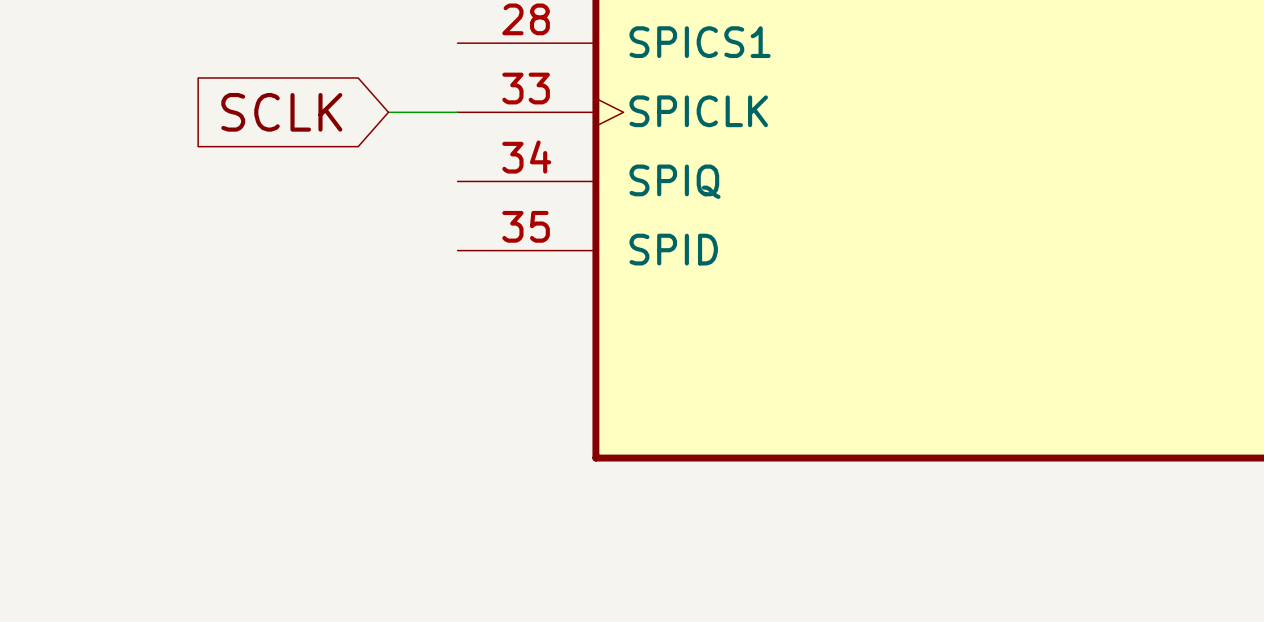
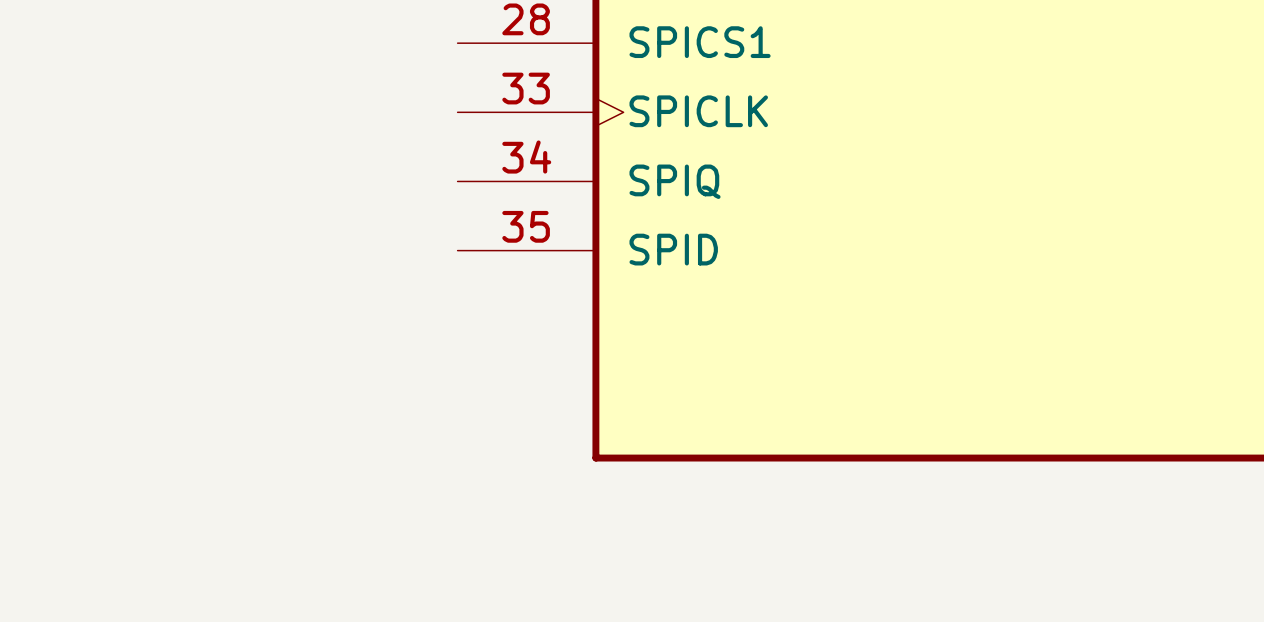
global label: SCLK (281, 112) -> none
wire: (388, 112) (457, 112) -> none

